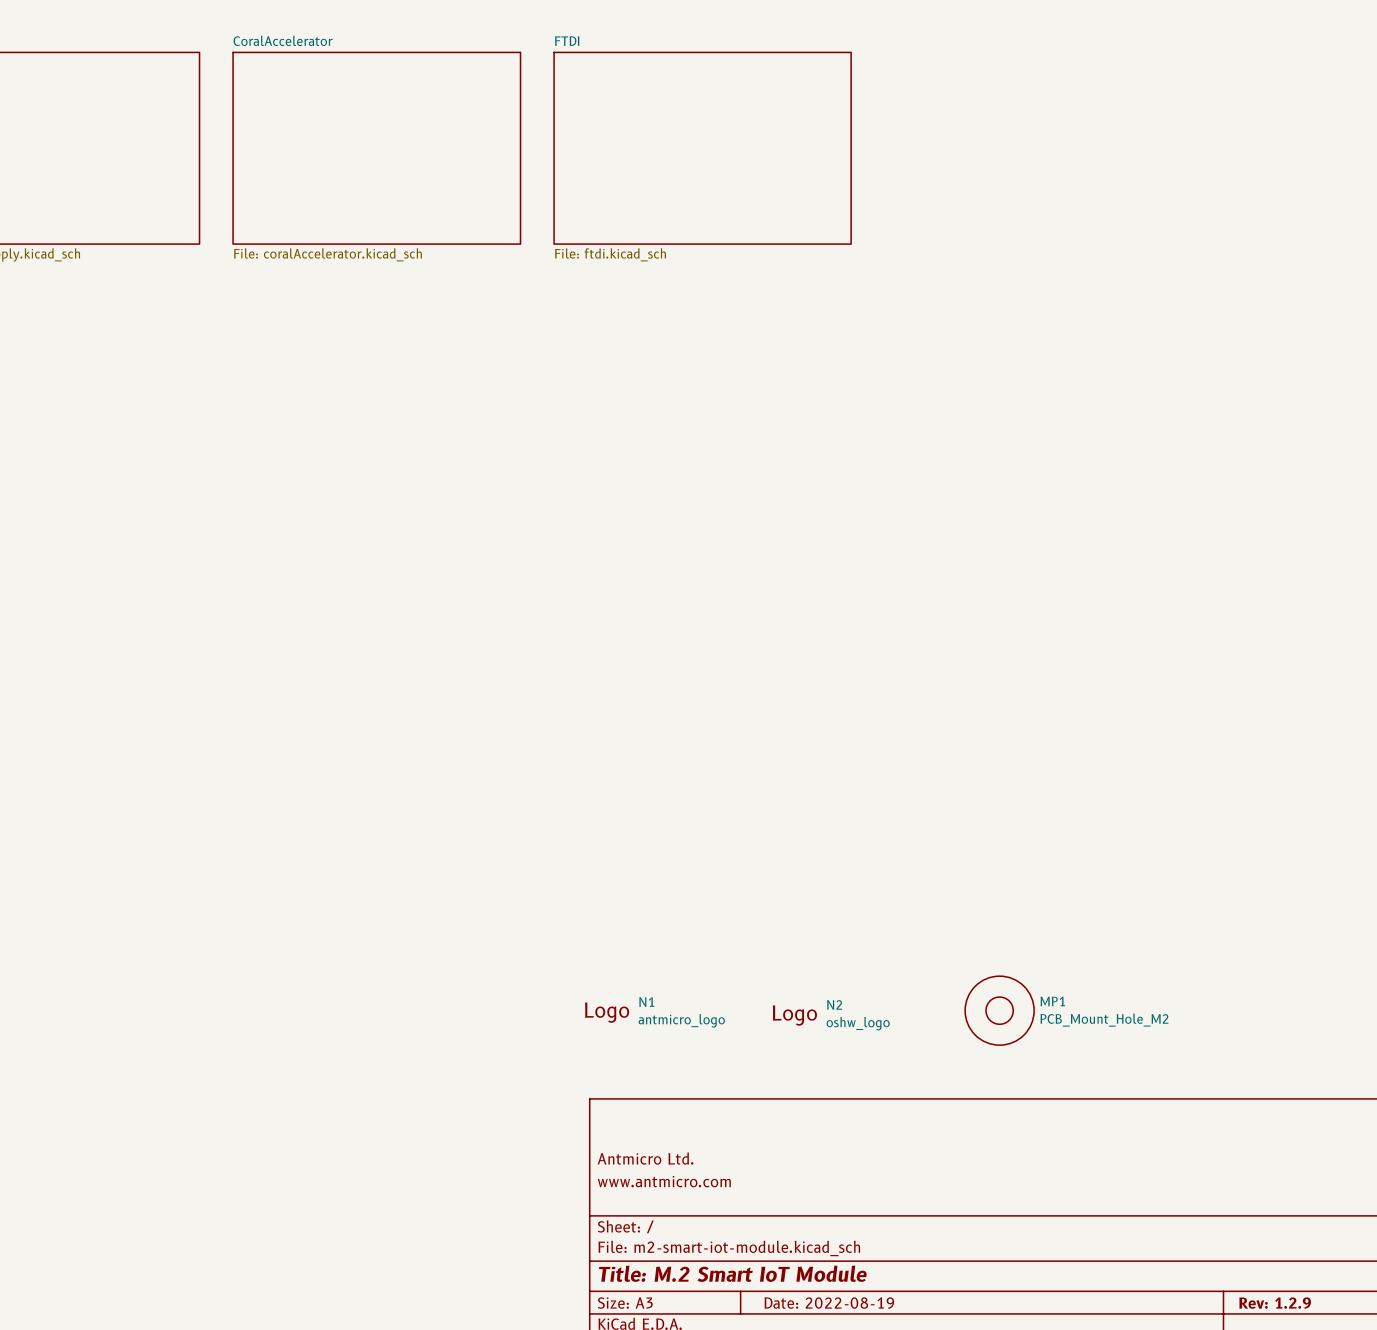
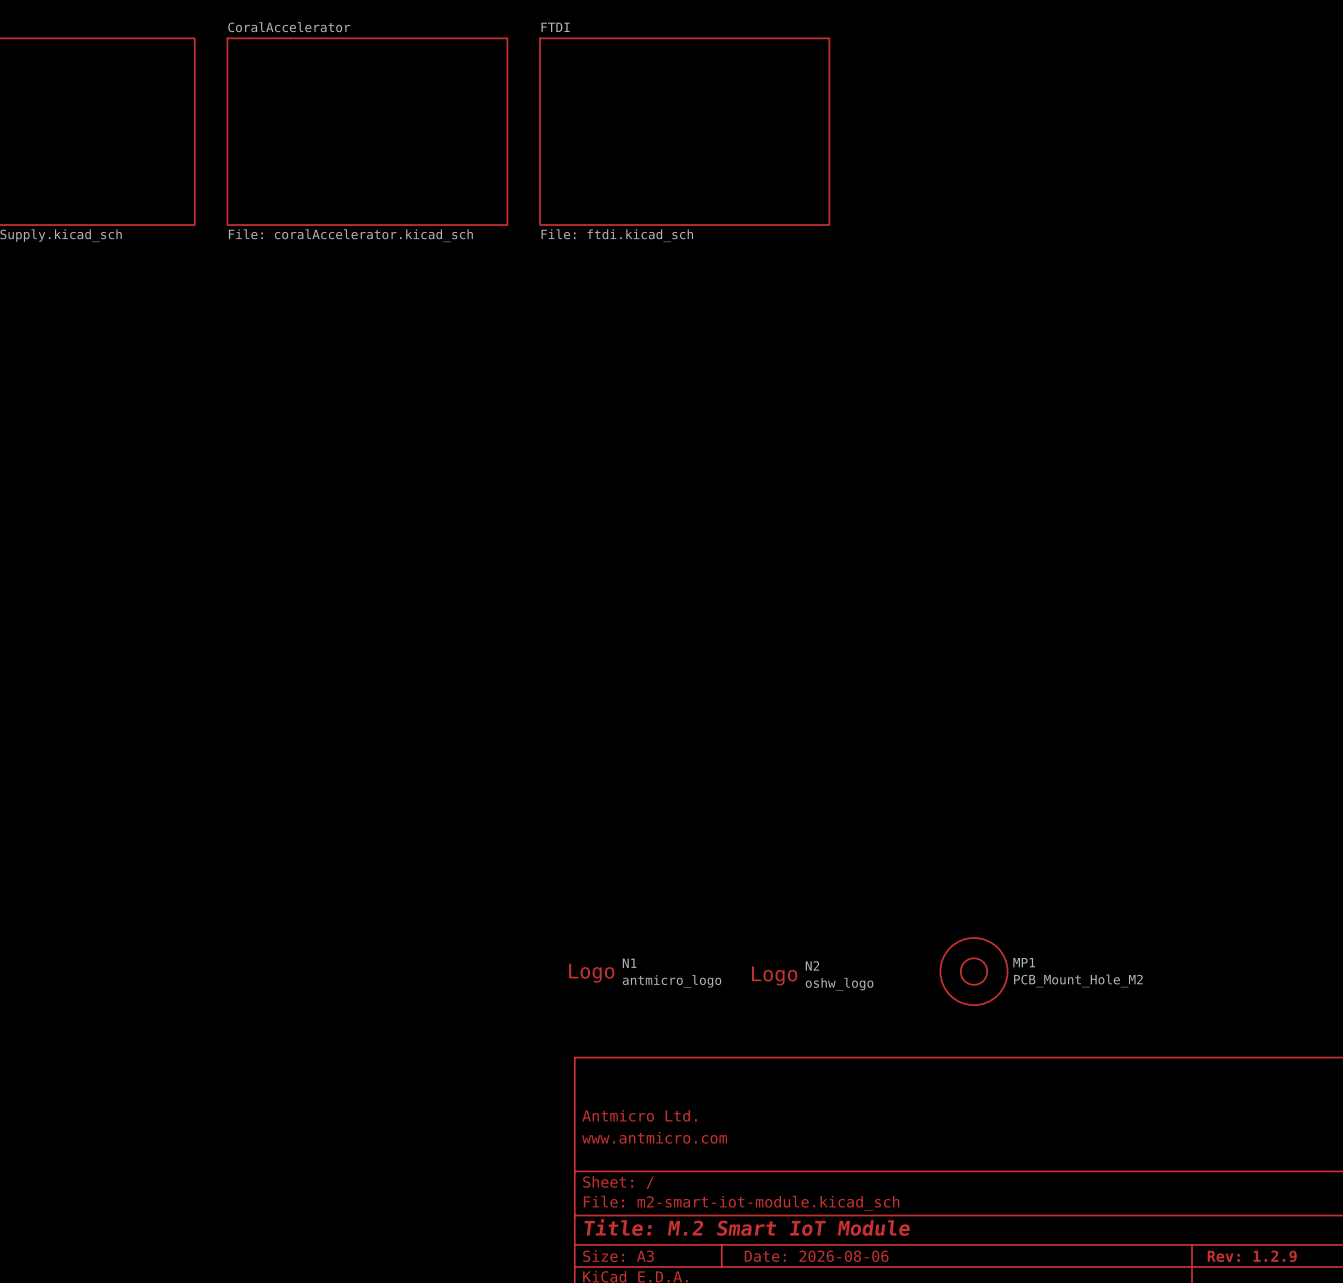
title block: Date: 2022-08-19 (829, 1303) -> Date: 2026-08-06 (816, 1256)

